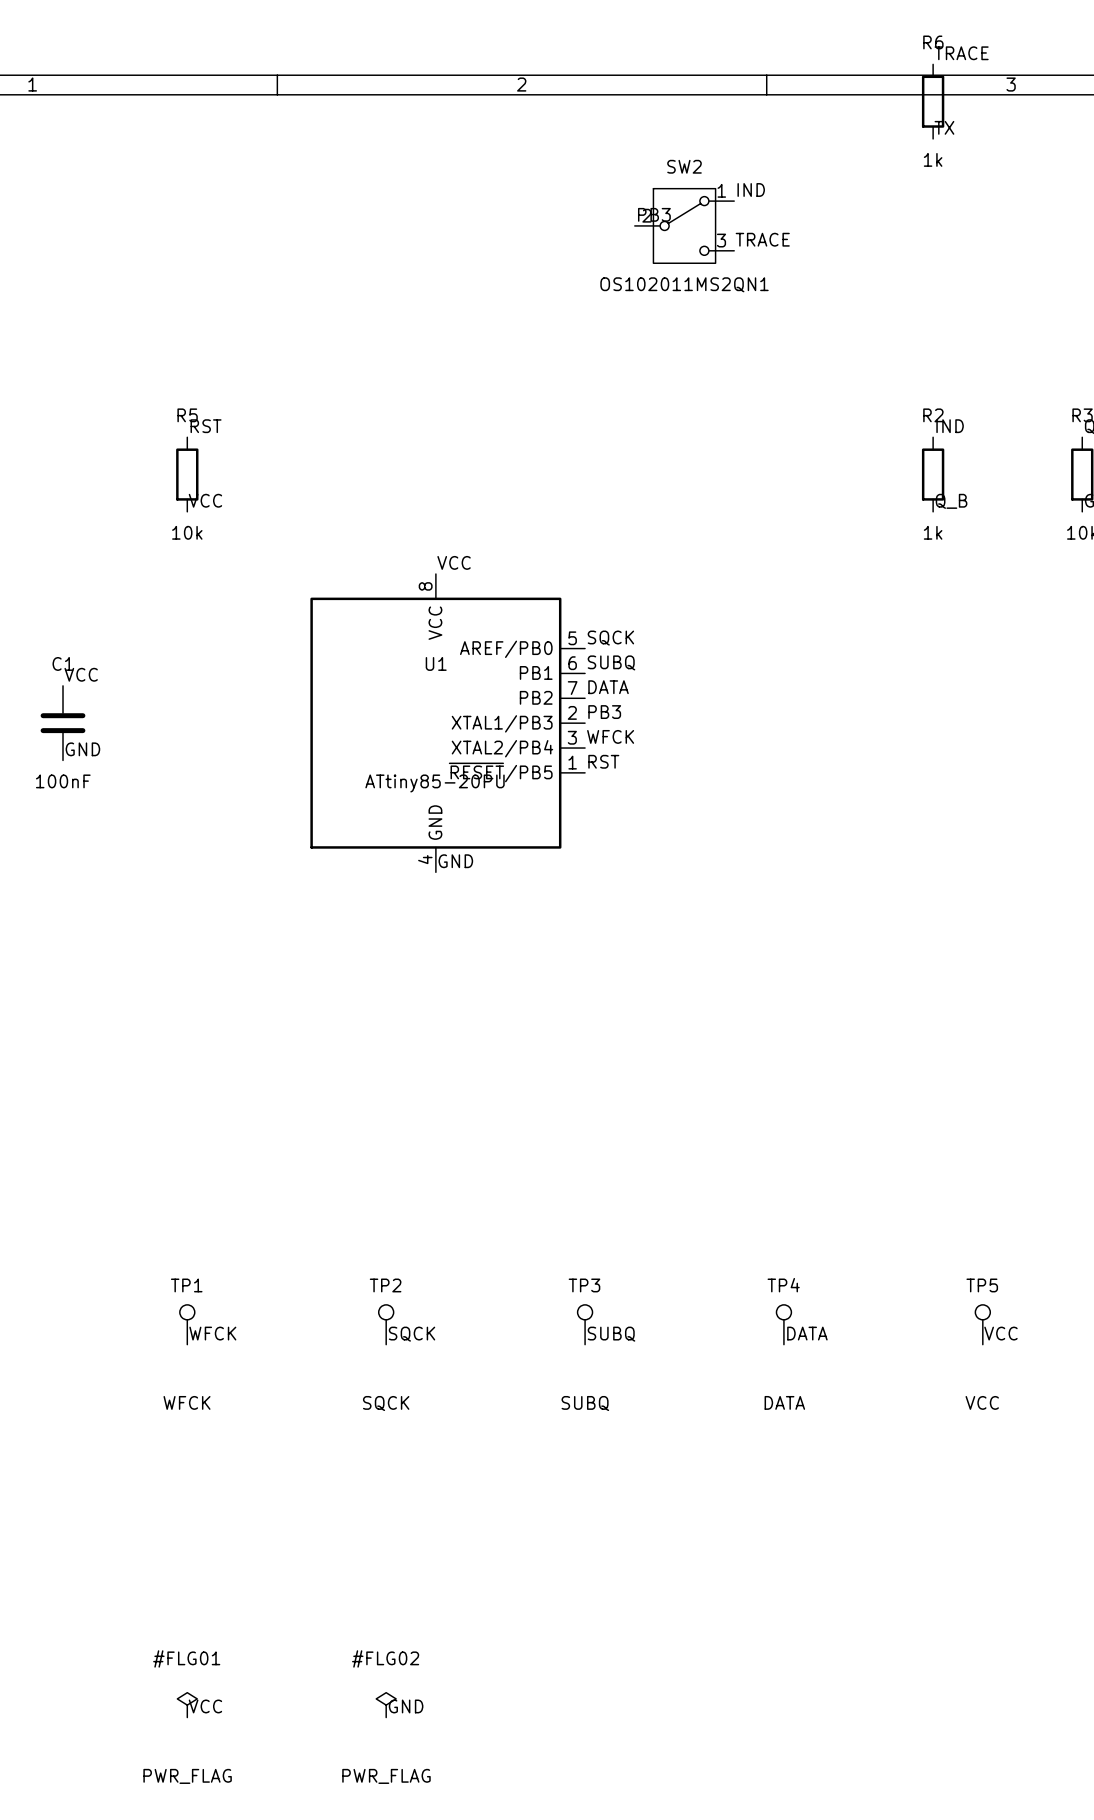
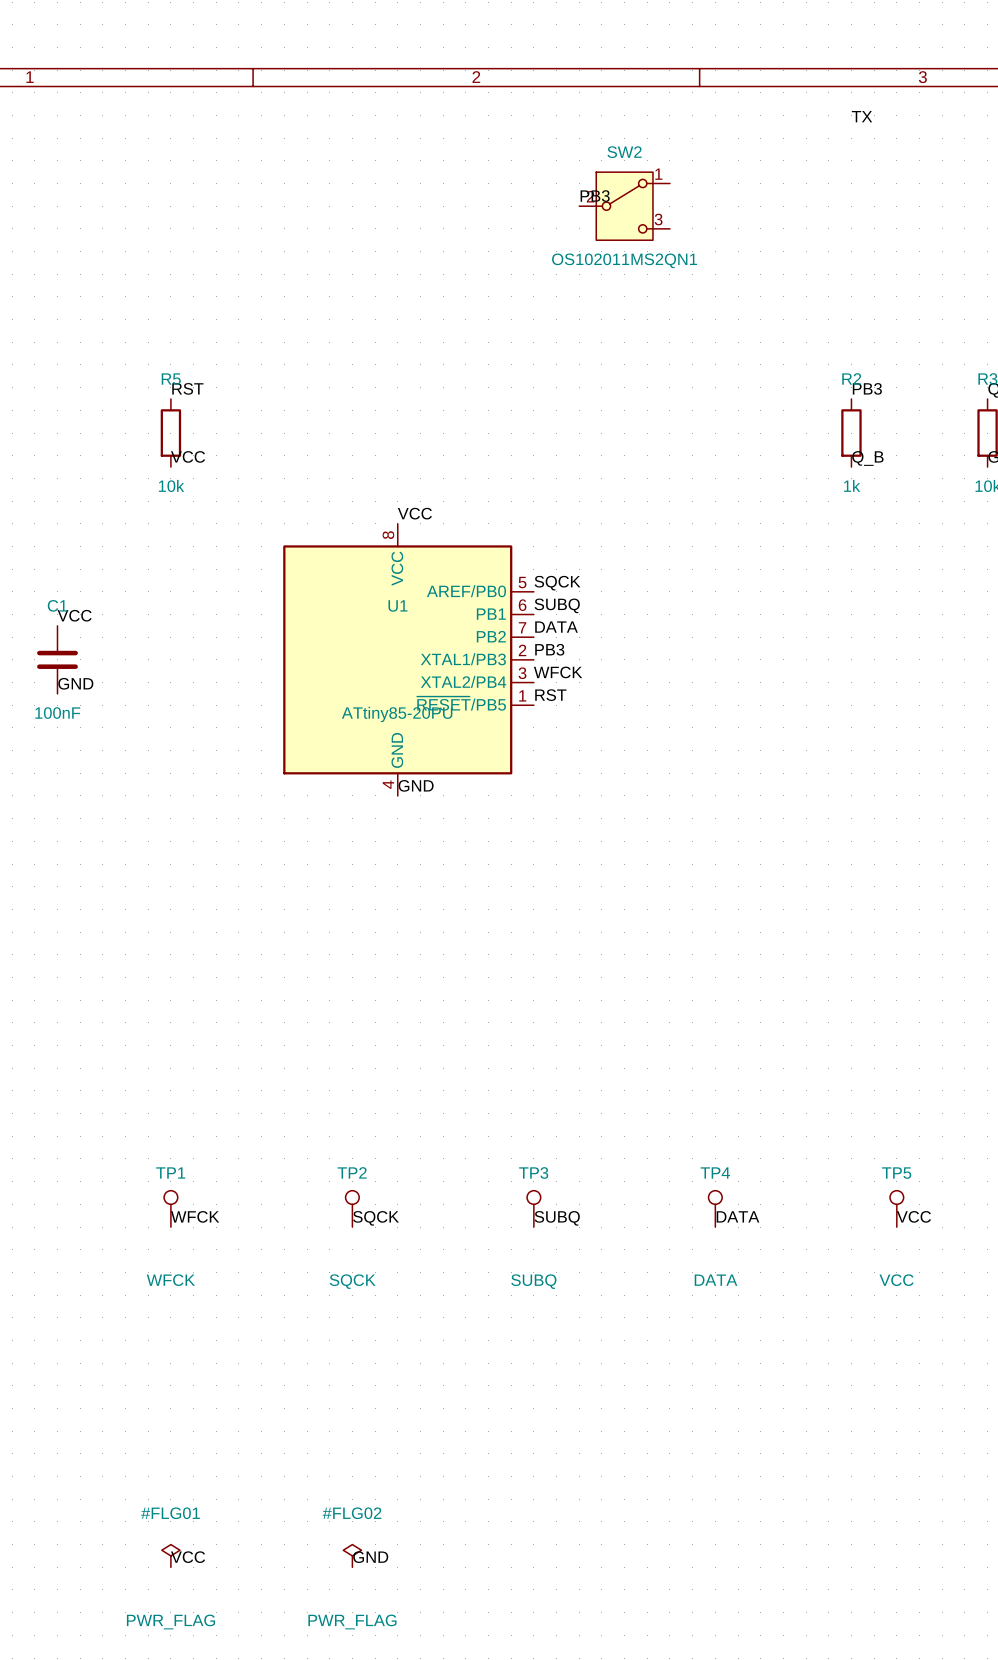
label: TRACE (961, 53) -> none
R6: 1k (933, 101) -> none
label: IND (751, 190) -> none
label: TRACE (762, 239) -> none
label: IND (950, 426) -> PB3 (867, 388)

